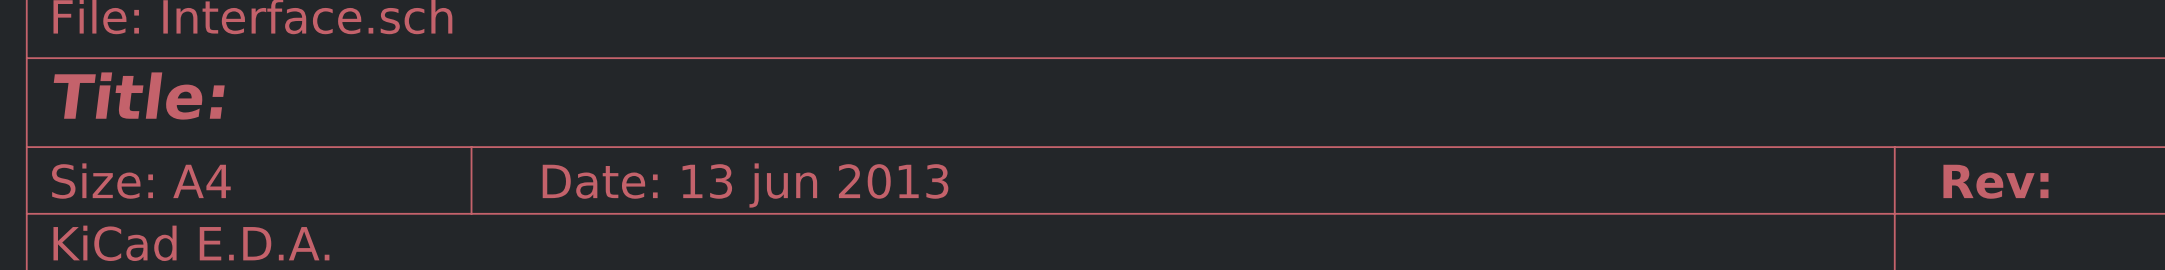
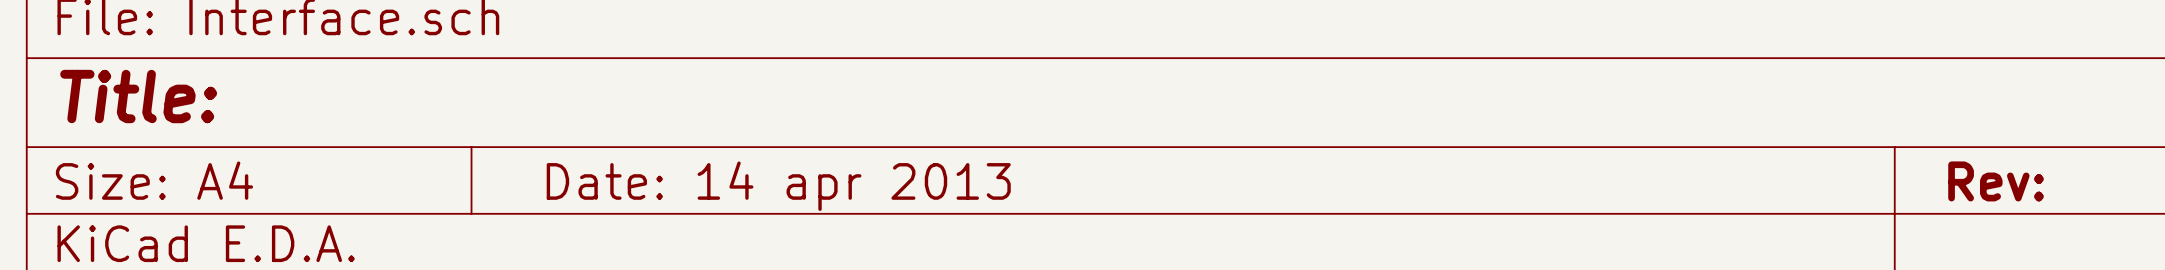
title block: Date: 13 jun 2013 (745, 185) -> Date: 14 apr 2013 (778, 186)

